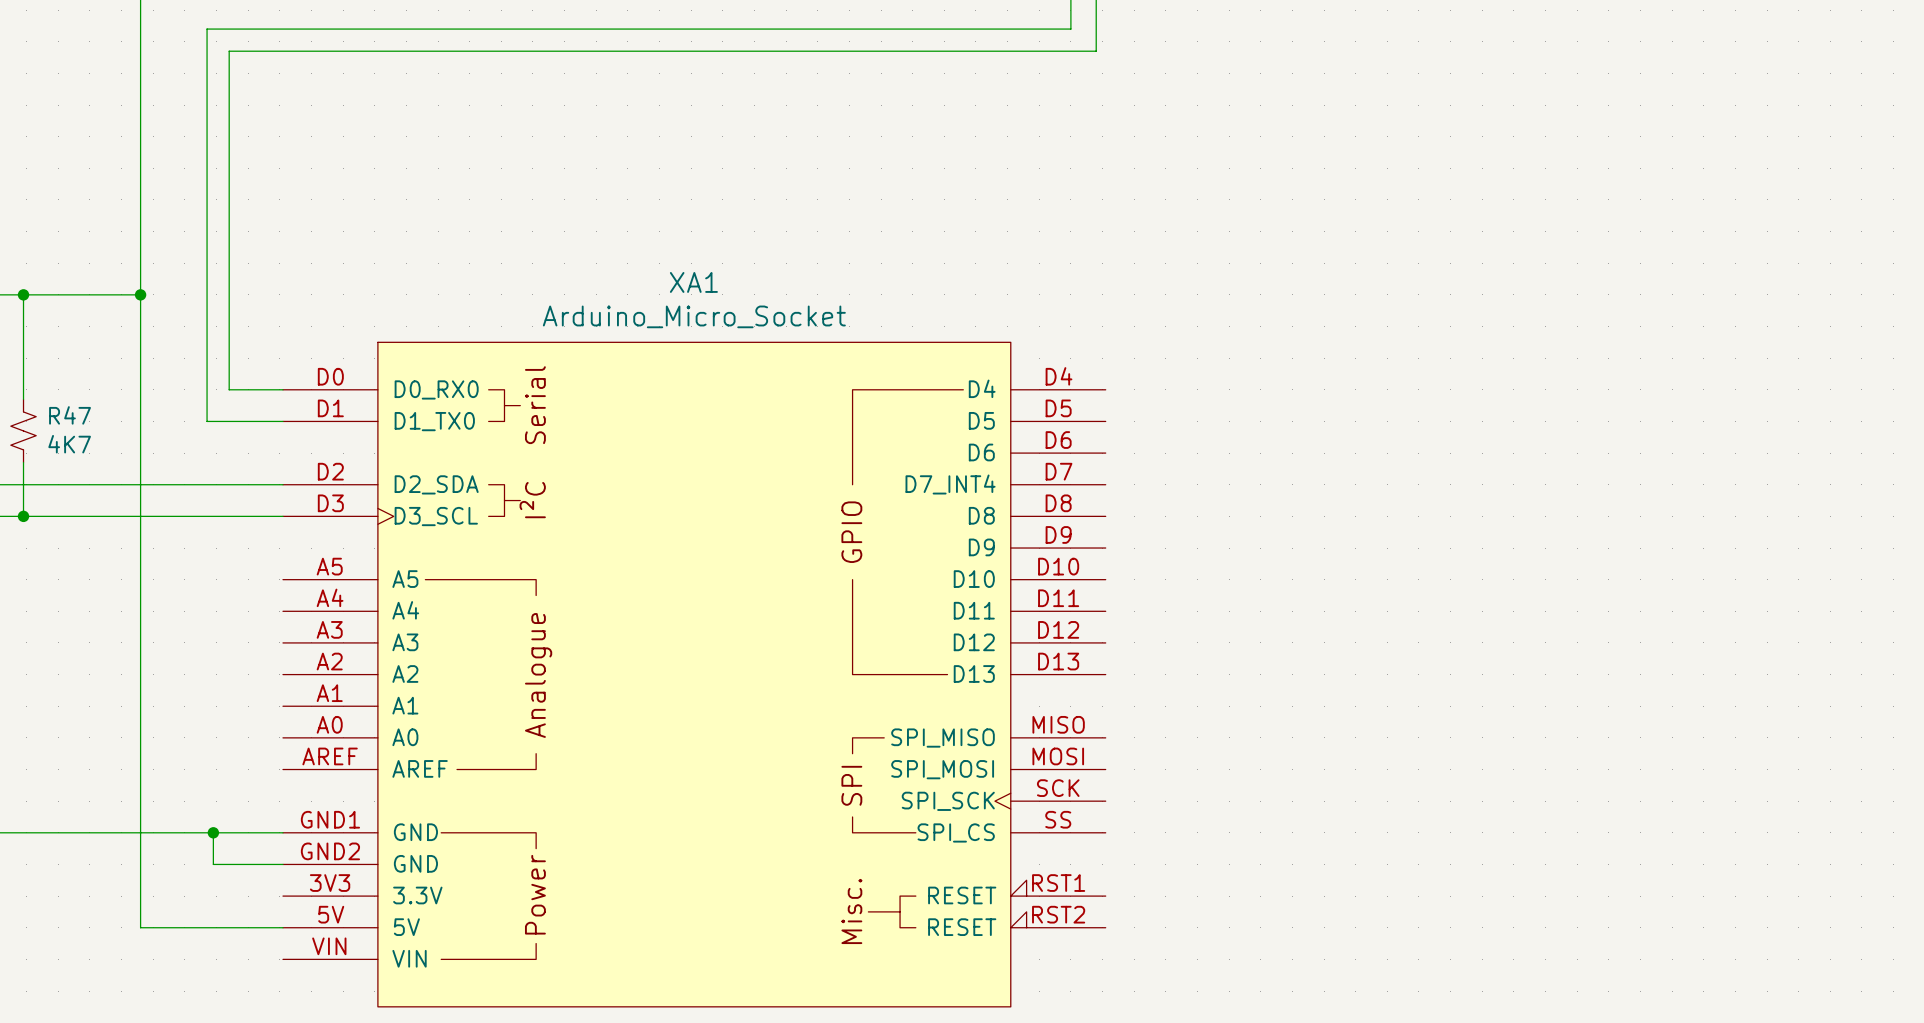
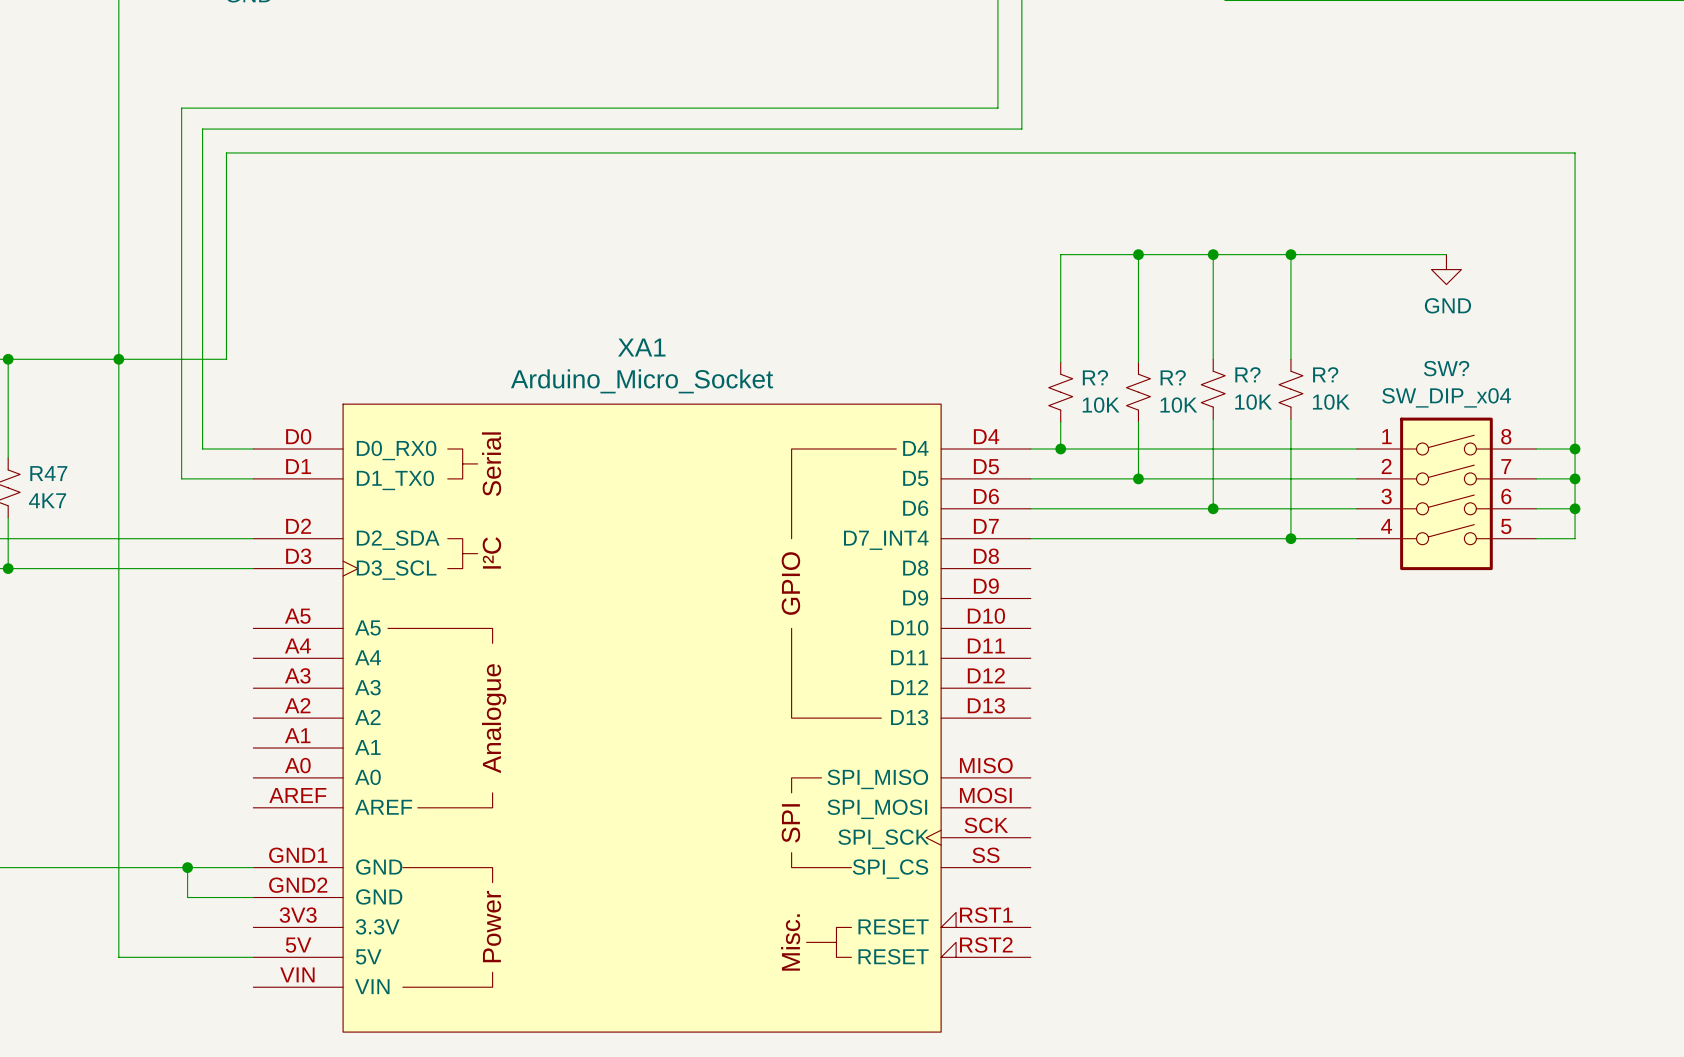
wire: none -> (1138, 254) (1138, 362)
junction: none -> (1138, 254)
wire: none -> (1213, 254) (1213, 359)
junction: none -> (1213, 254)
wire: none -> (1290, 254) (1290, 359)
junction: none -> (1290, 254)
wire: none -> (1446, 254) (1060, 254) (1060, 362)
power symbol: none -> GND (1446, 269)
wire: none -> (118, 359) (226, 359) (226, 152) (1575, 152) (1575, 538) (1536, 538)
R?: none -> 10K (1213, 389)
R?: none -> 10K (1290, 389)
R?: none -> 10K (1060, 392)
R?: none -> 10K (1138, 392)
wire: none -> (1213, 419) (1213, 508)
wire: none -> (1290, 419) (1290, 538)
wire: none -> (1060, 422) (1060, 449)
wire: none -> (1138, 422) (1138, 478)
wire: none -> (1030, 449) (1356, 449)
junction: none -> (1060, 449)
wire: none -> (1536, 449) (1575, 449)
junction: none -> (1575, 449)
wire: none -> (1030, 478) (1356, 478)
junction: none -> (1138, 478)
wire: none -> (1536, 478) (1575, 478)
junction: none -> (1575, 478)
SW?: none -> SW_DIP_x04 (1446, 493)
wire: none -> (1030, 508) (1356, 508)
junction: none -> (1213, 508)
wire: none -> (1536, 508) (1575, 508)
junction: none -> (1575, 508)
wire: none -> (1030, 538) (1356, 538)
junction: none -> (1290, 538)

